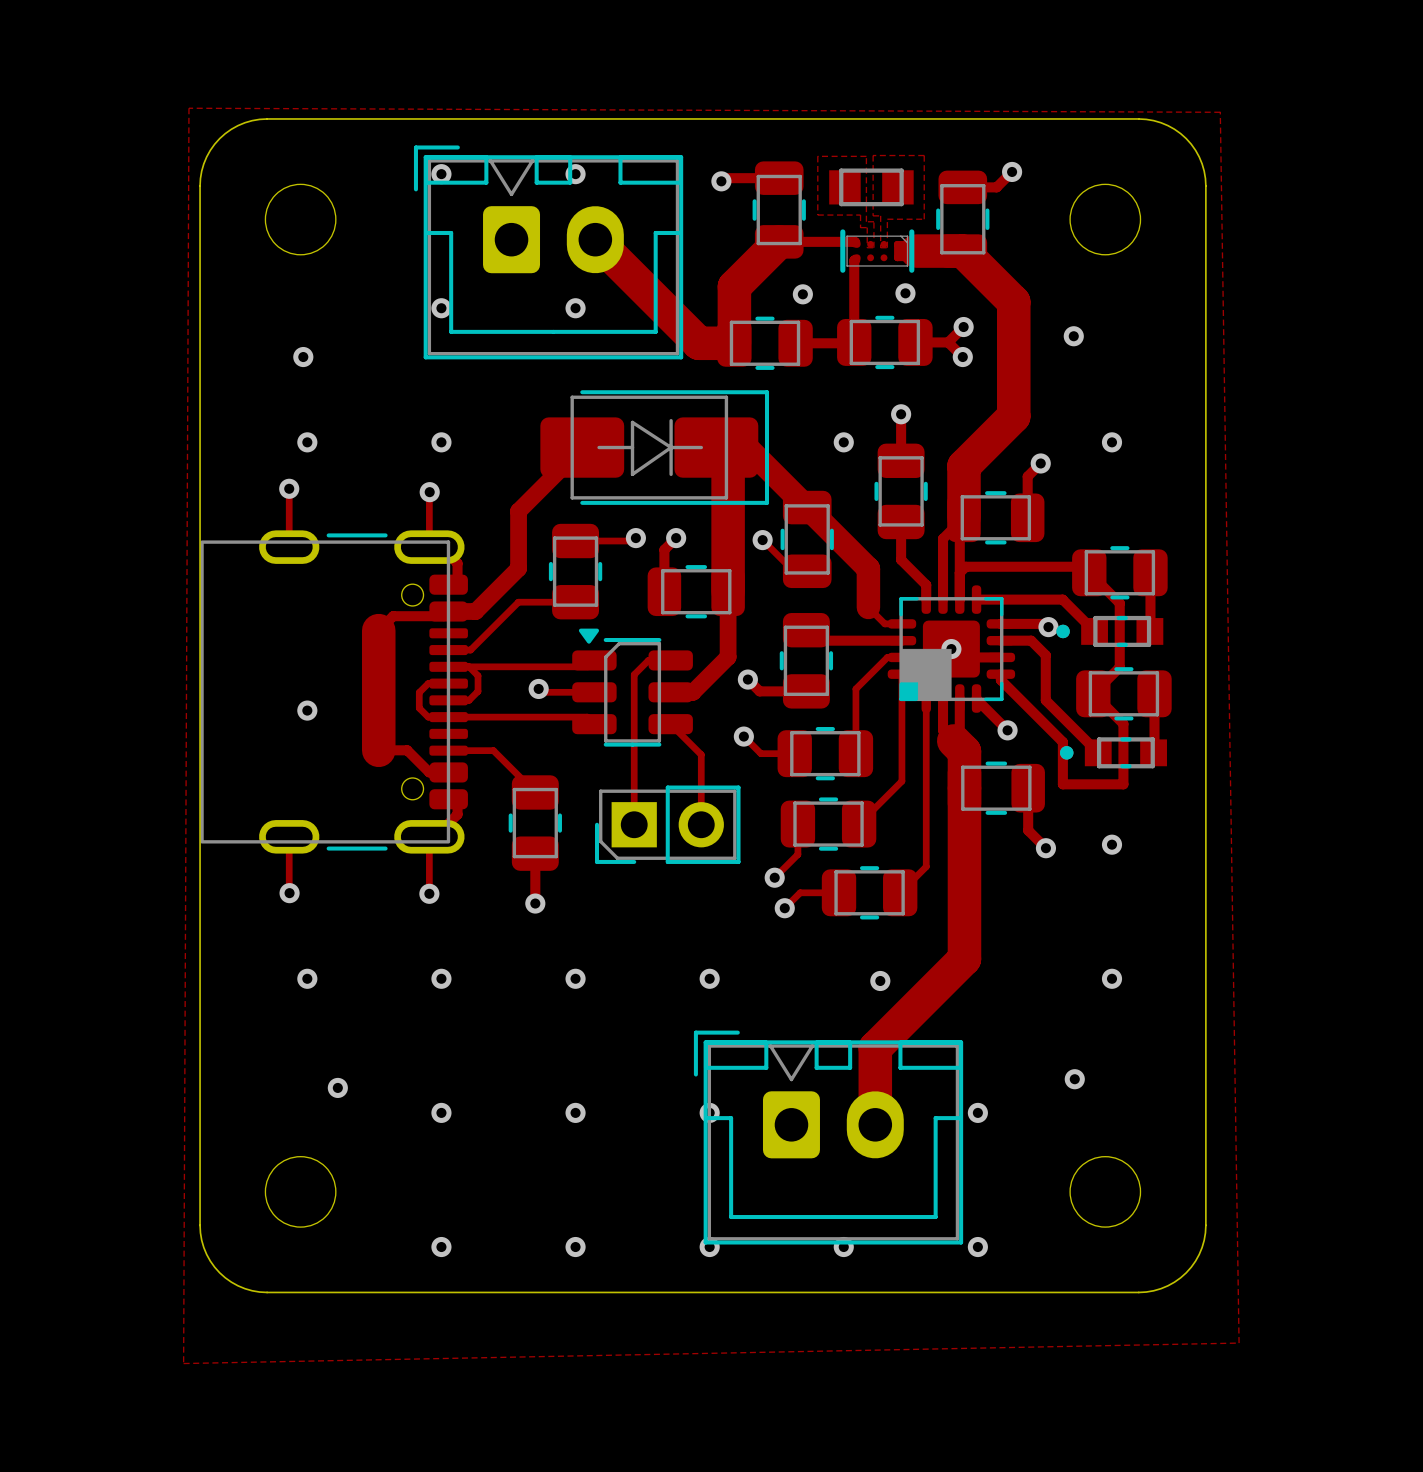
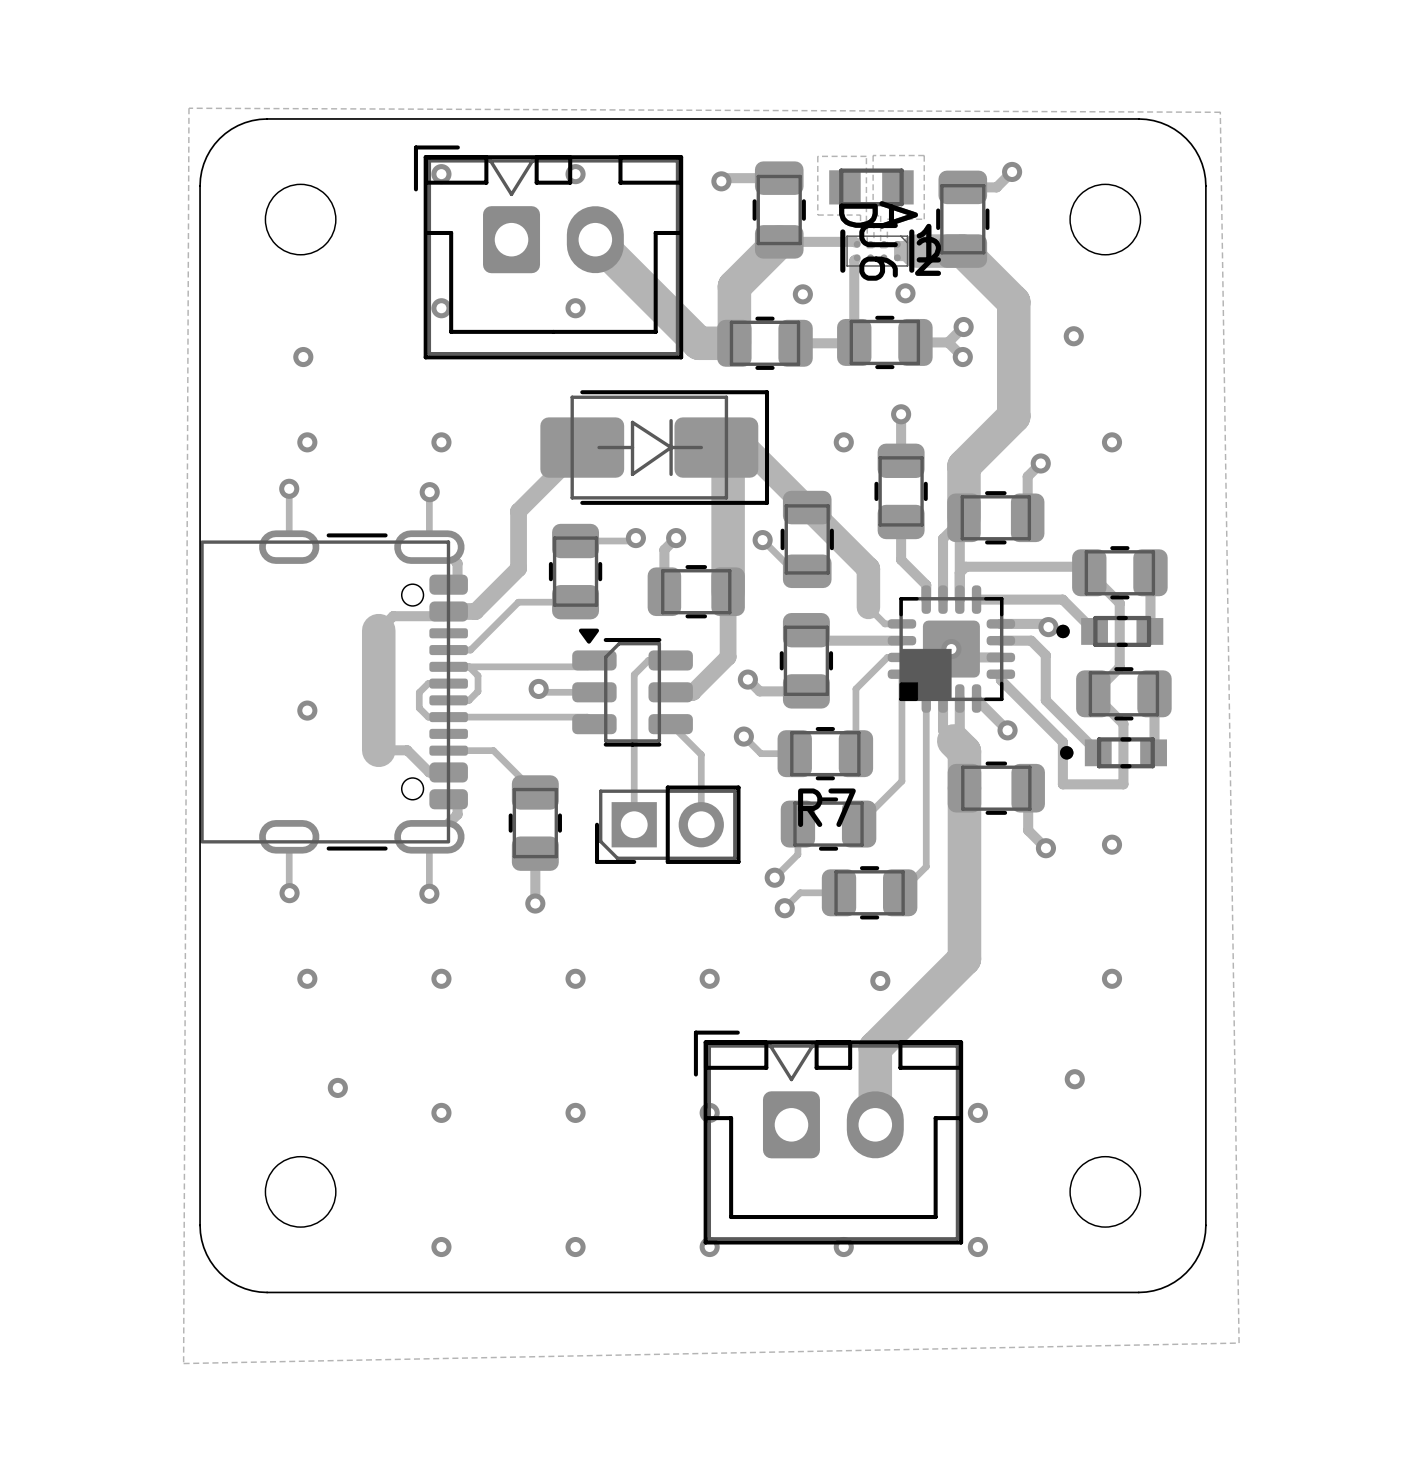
U6 footprint: [840, 229, 915, 273] -> [840, 229, 915, 273]
U6 name: none -> U6 (878, 251)
R7 name: none -> R7 (826, 807)

